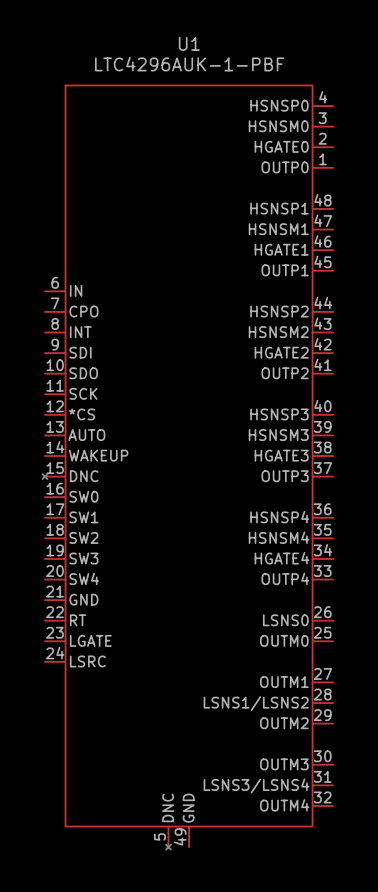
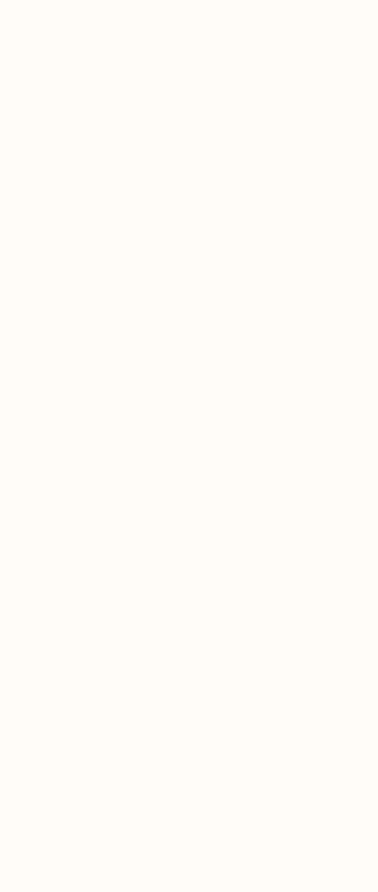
U1: LTC4296AUK-1-PBF (187, 467) -> none

